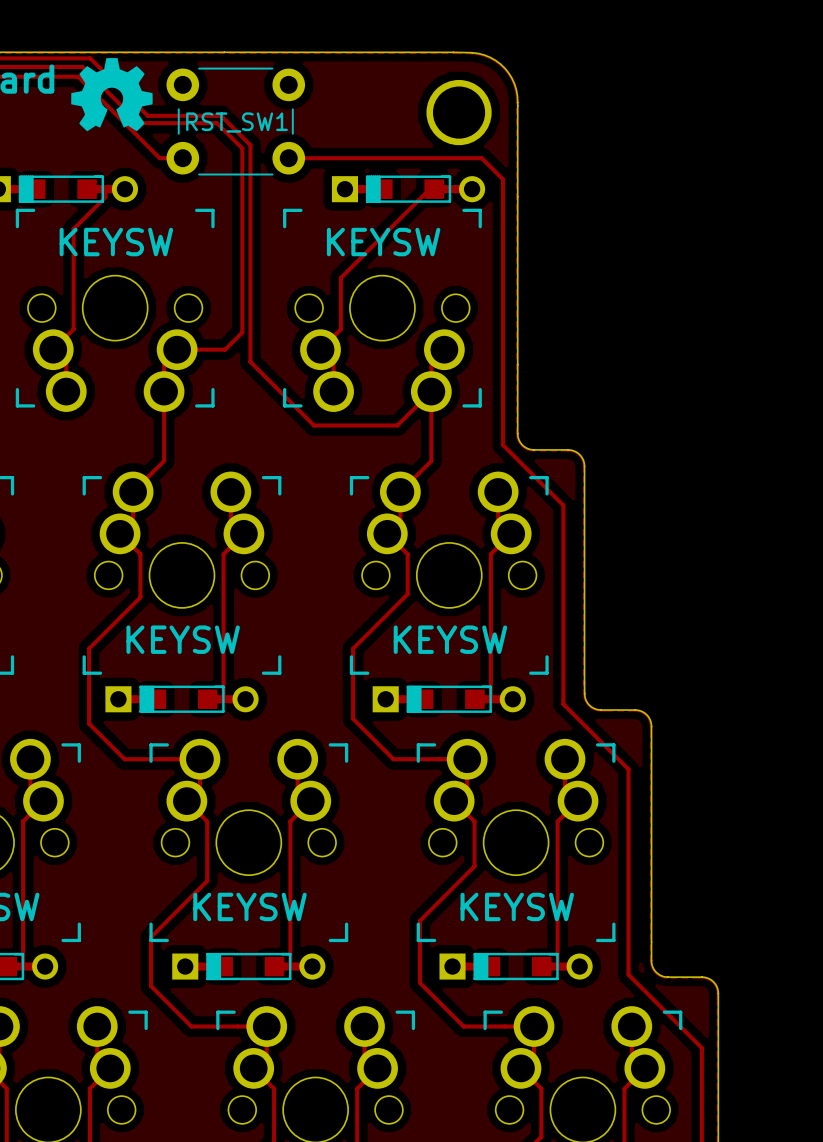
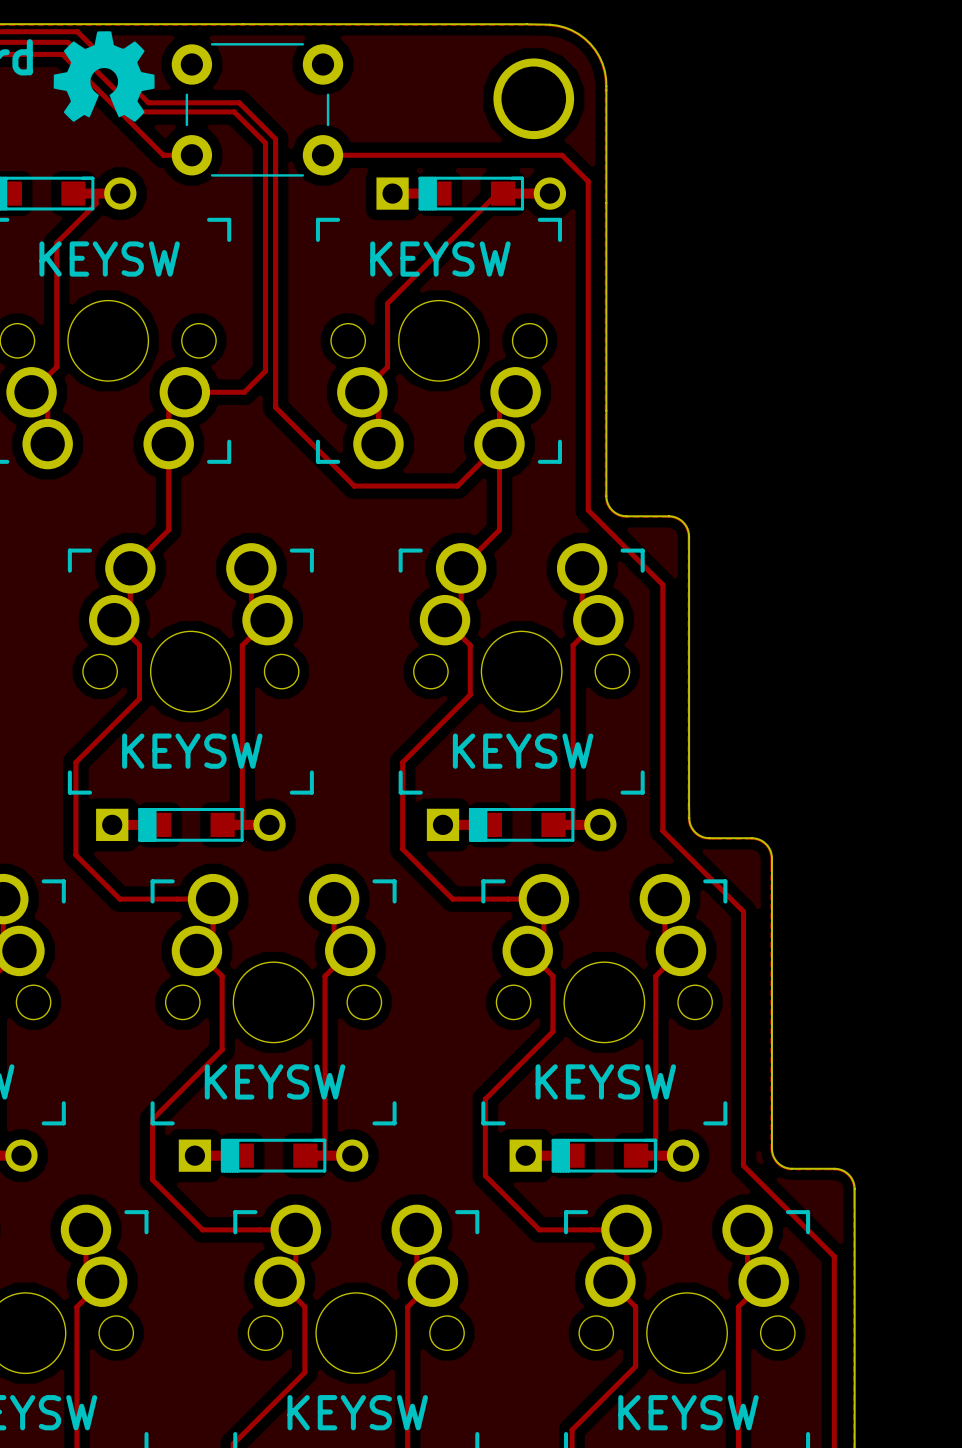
RST_SW1 name: RST_SW1 (236, 122) -> none

